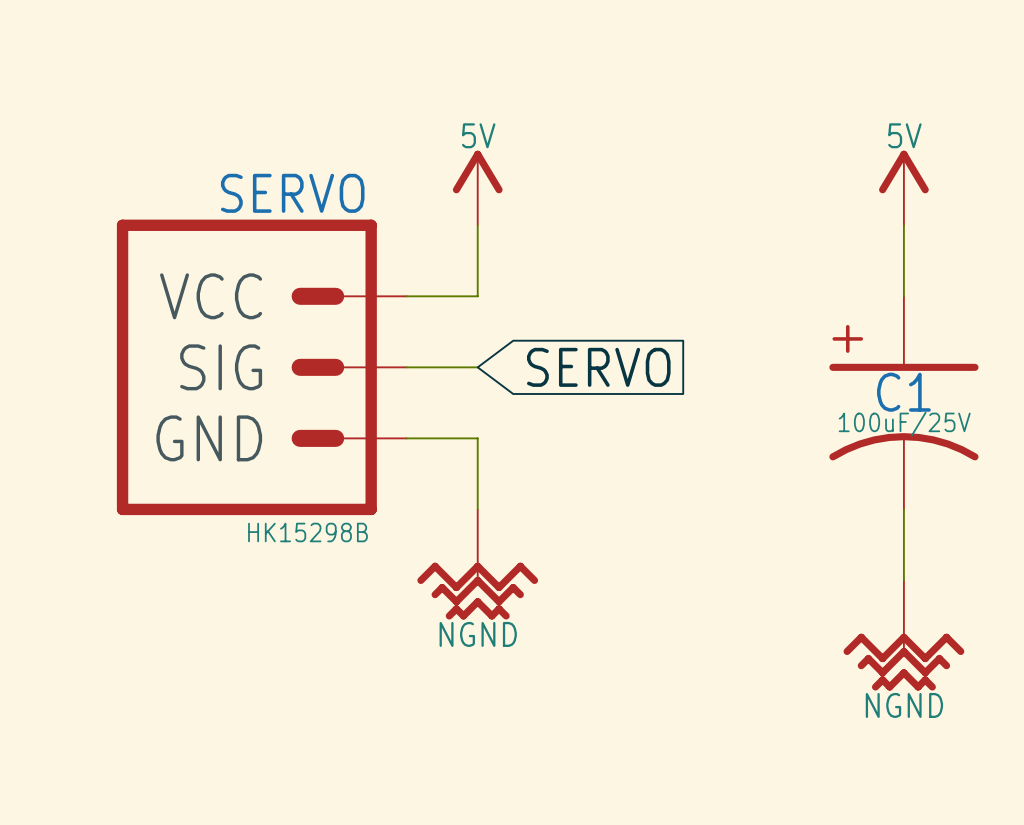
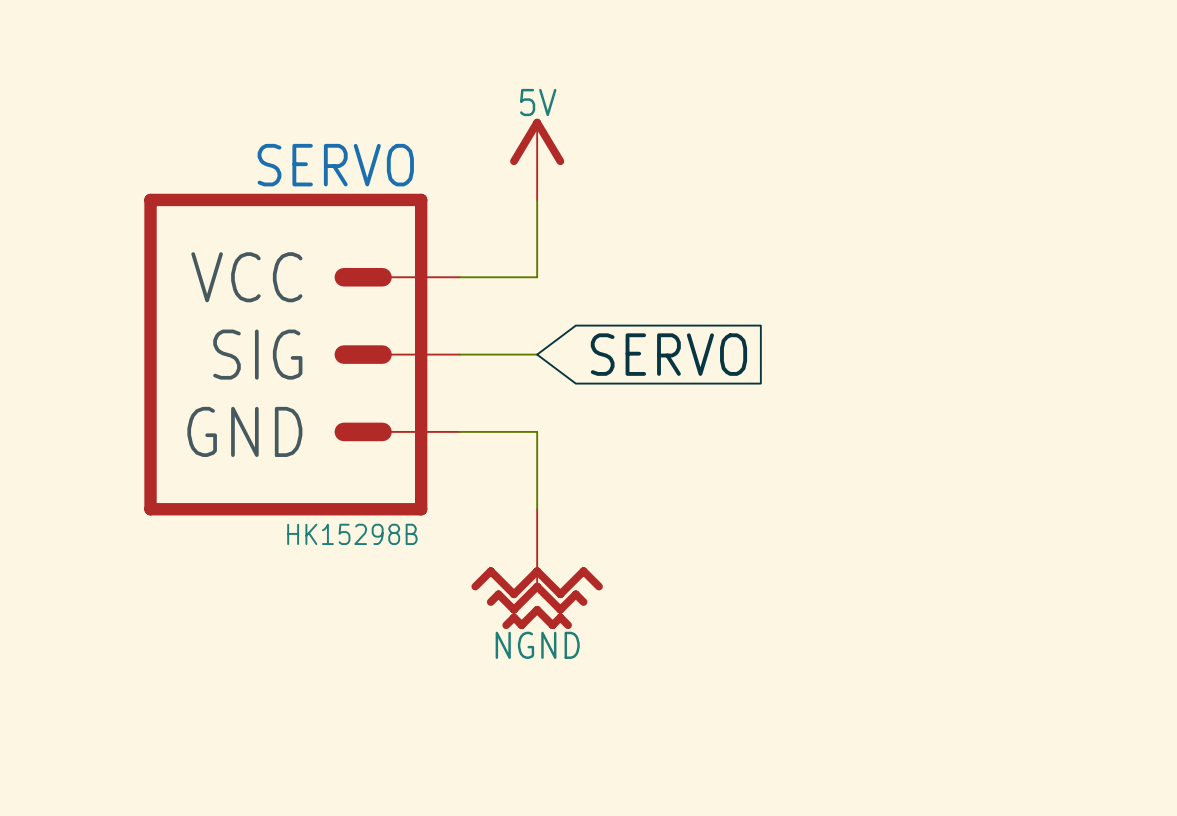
power symbol: (903, 187) -> none
wire: (903, 225) (903, 296) -> none
C1: 100uF/25V (903, 402) -> none
wire: (903, 509) (903, 580) -> none
power symbol: (903, 635) -> none

